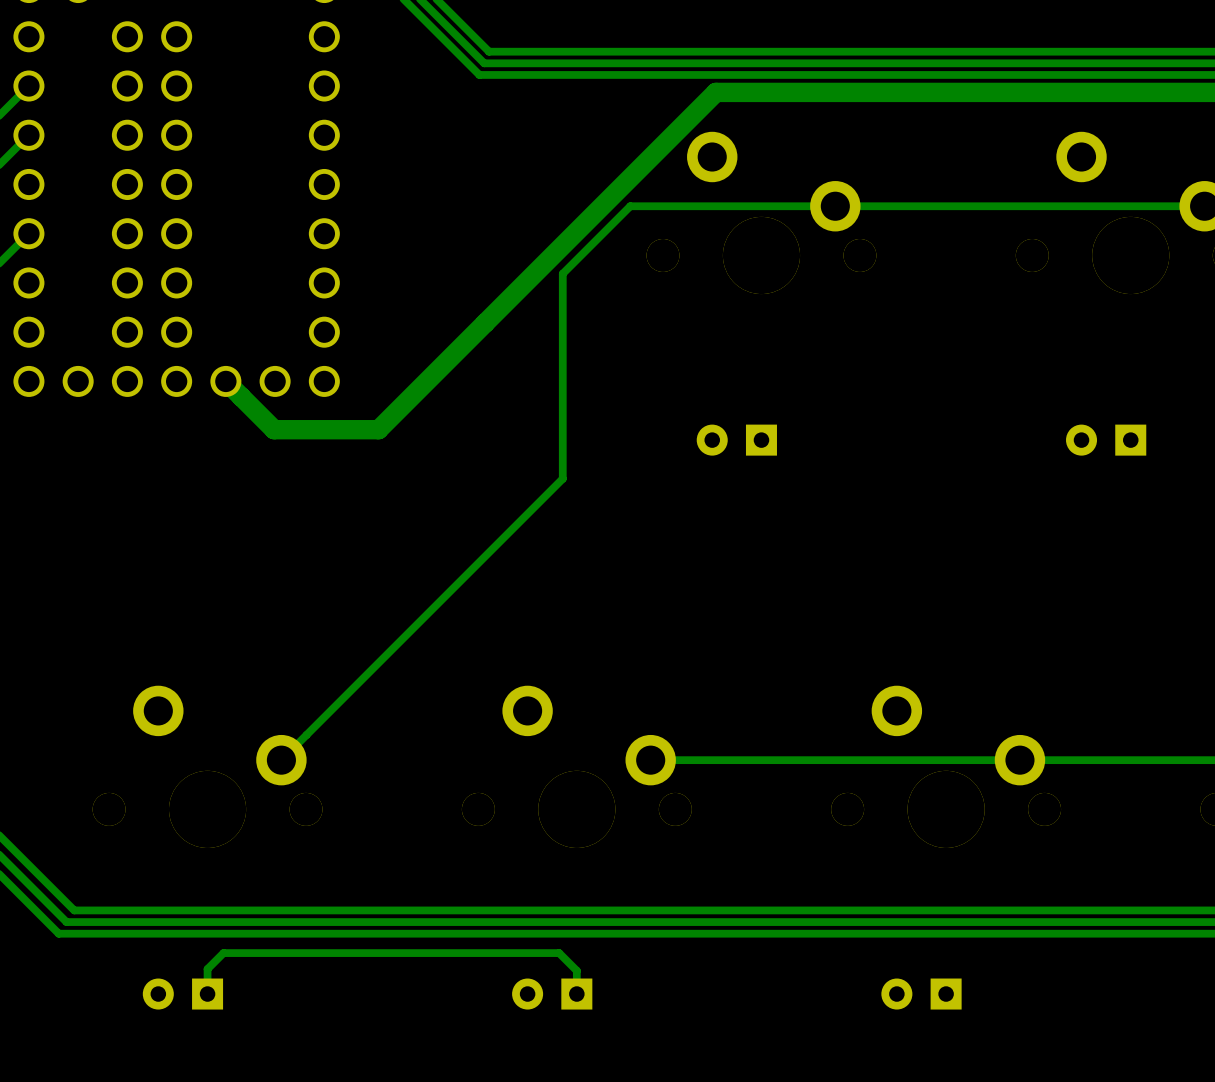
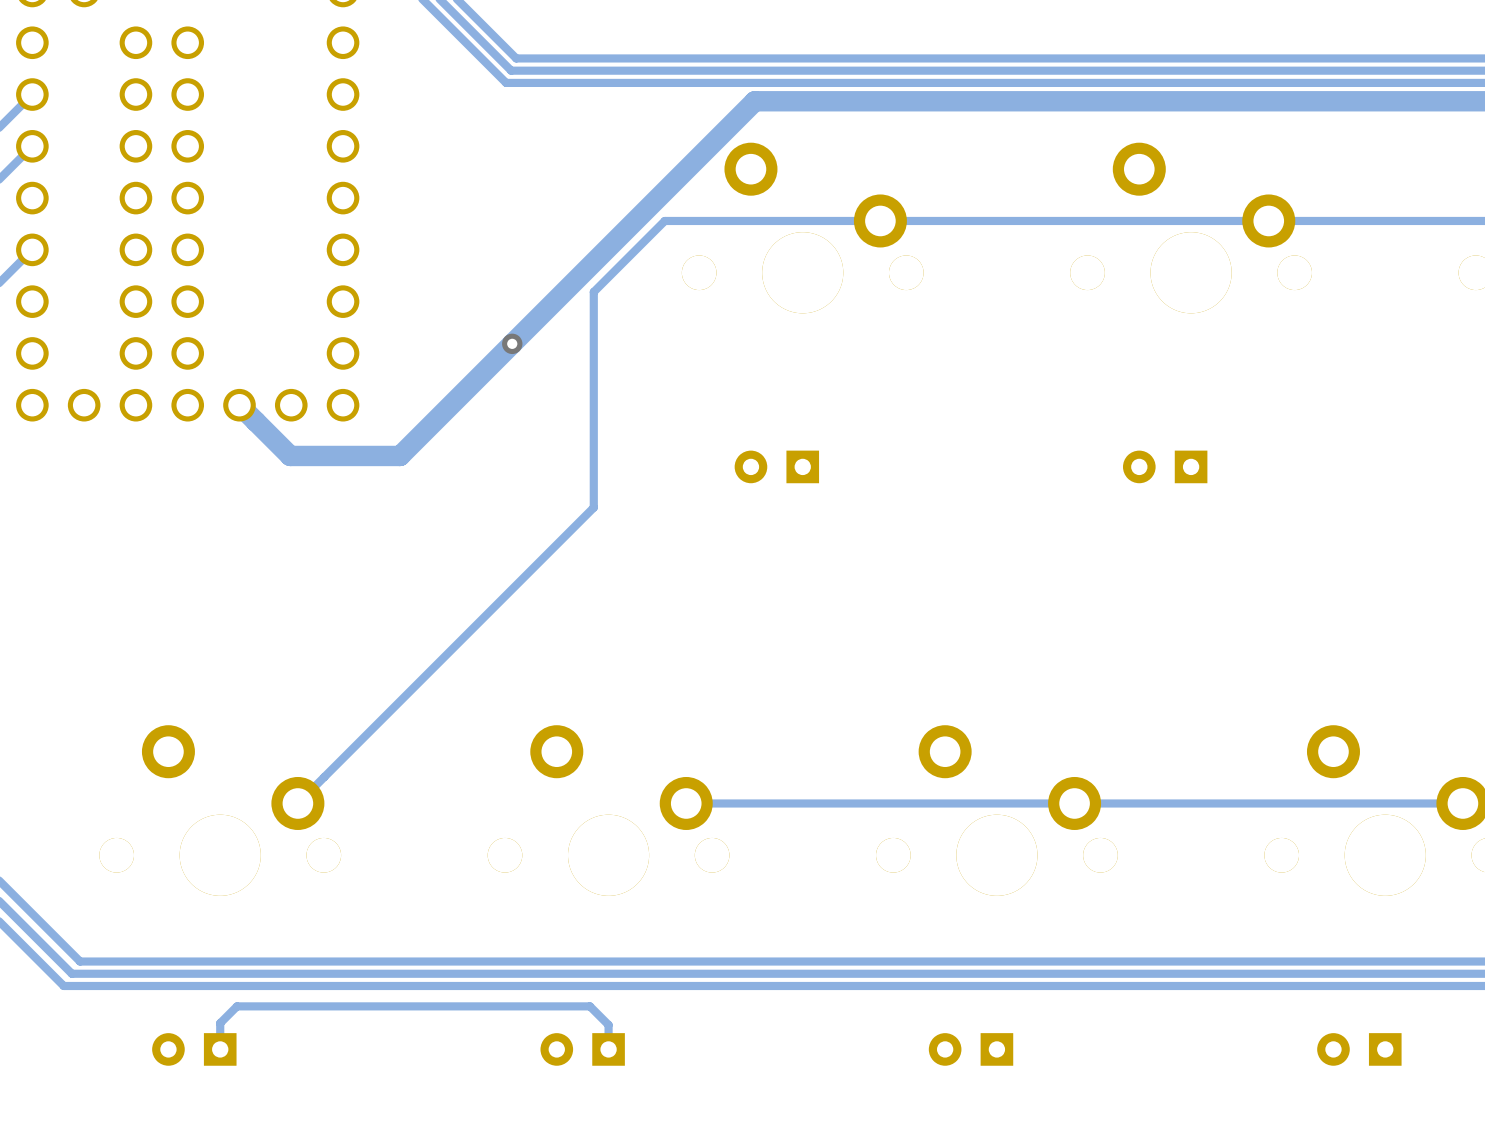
via: none -> (512, 343)

